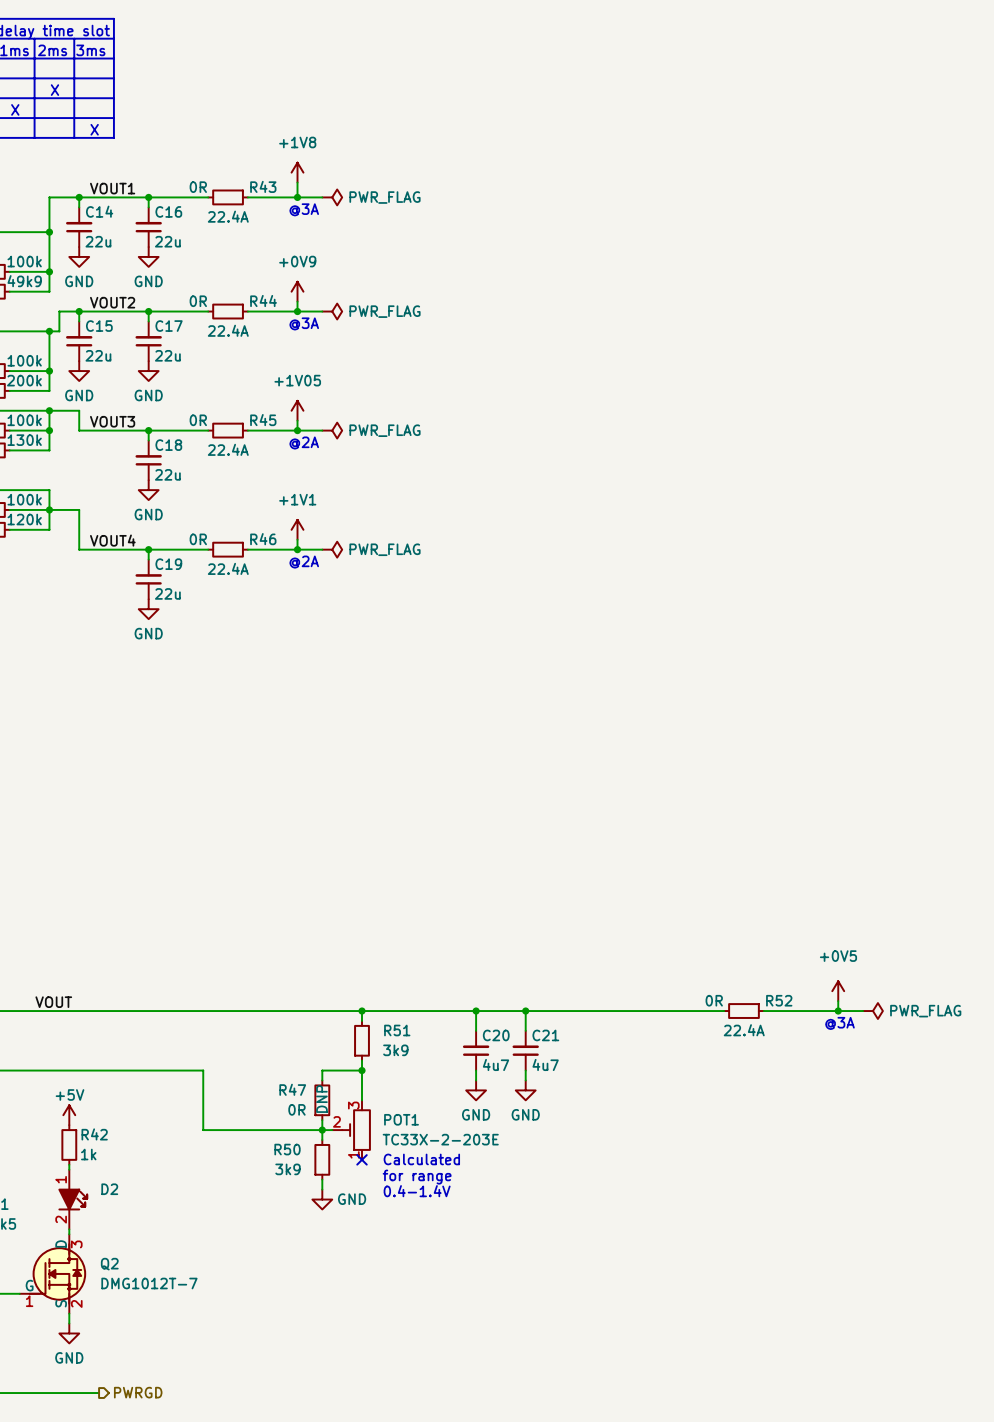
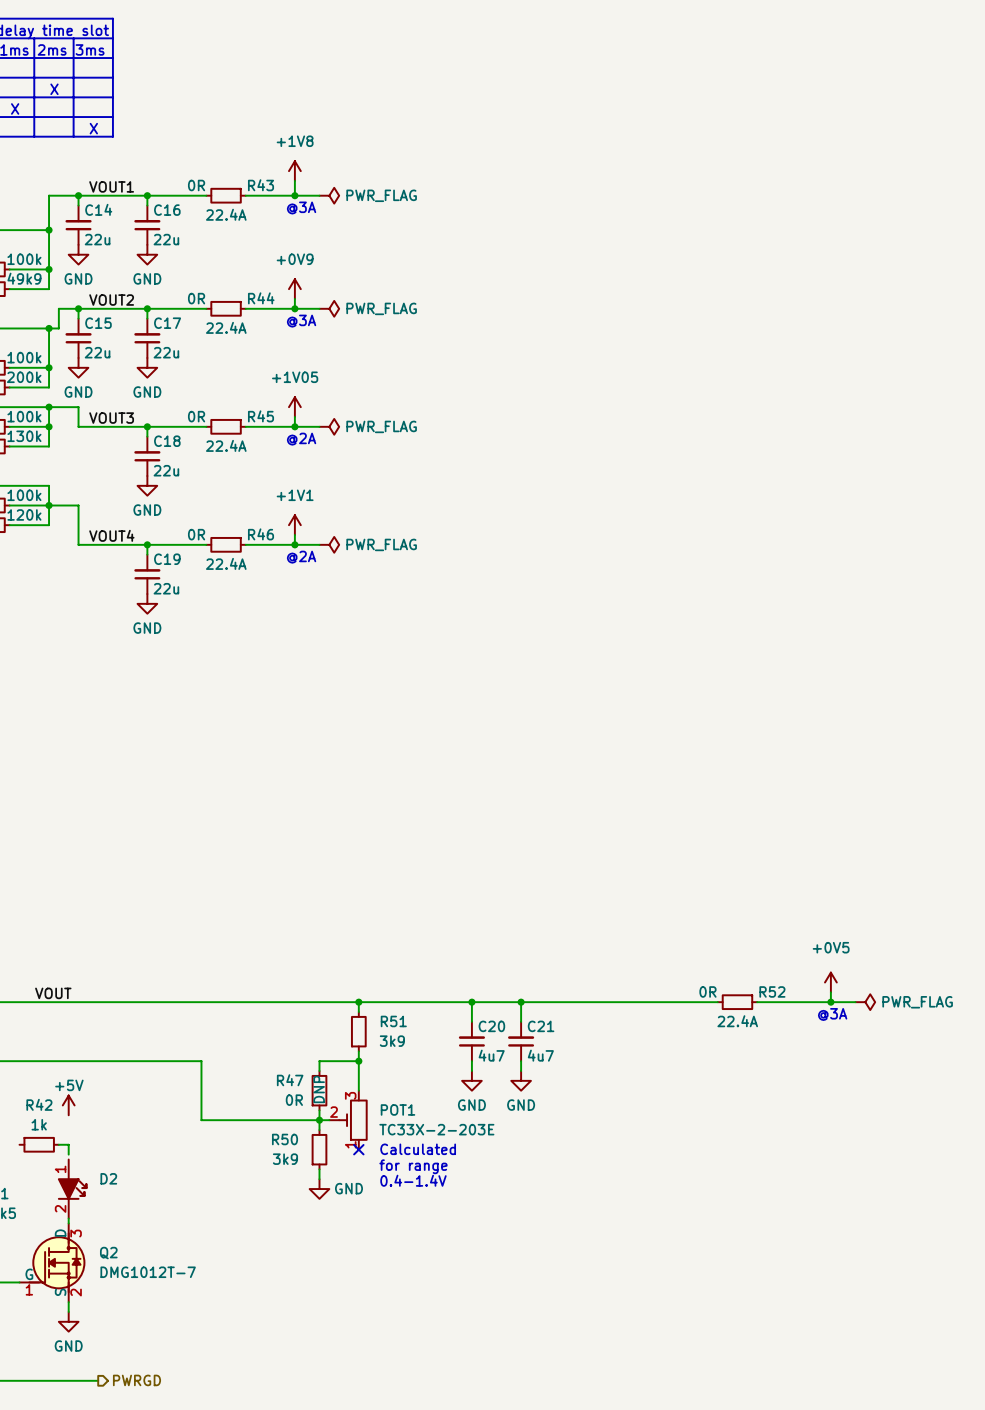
R42 name position: R42 (94, 1134) -> R42 (39, 1104)
R42 rotation: 0° (69, 1144) -> 90° clockwise (39, 1144)
R42 position: (69, 1144) -> (39, 1144)
R42 text position: 1k (88, 1154) -> 1k (39, 1124)
wire: (69, 1164) (69, 1169) -> (68, 1154) (68, 1144) (58, 1144)

